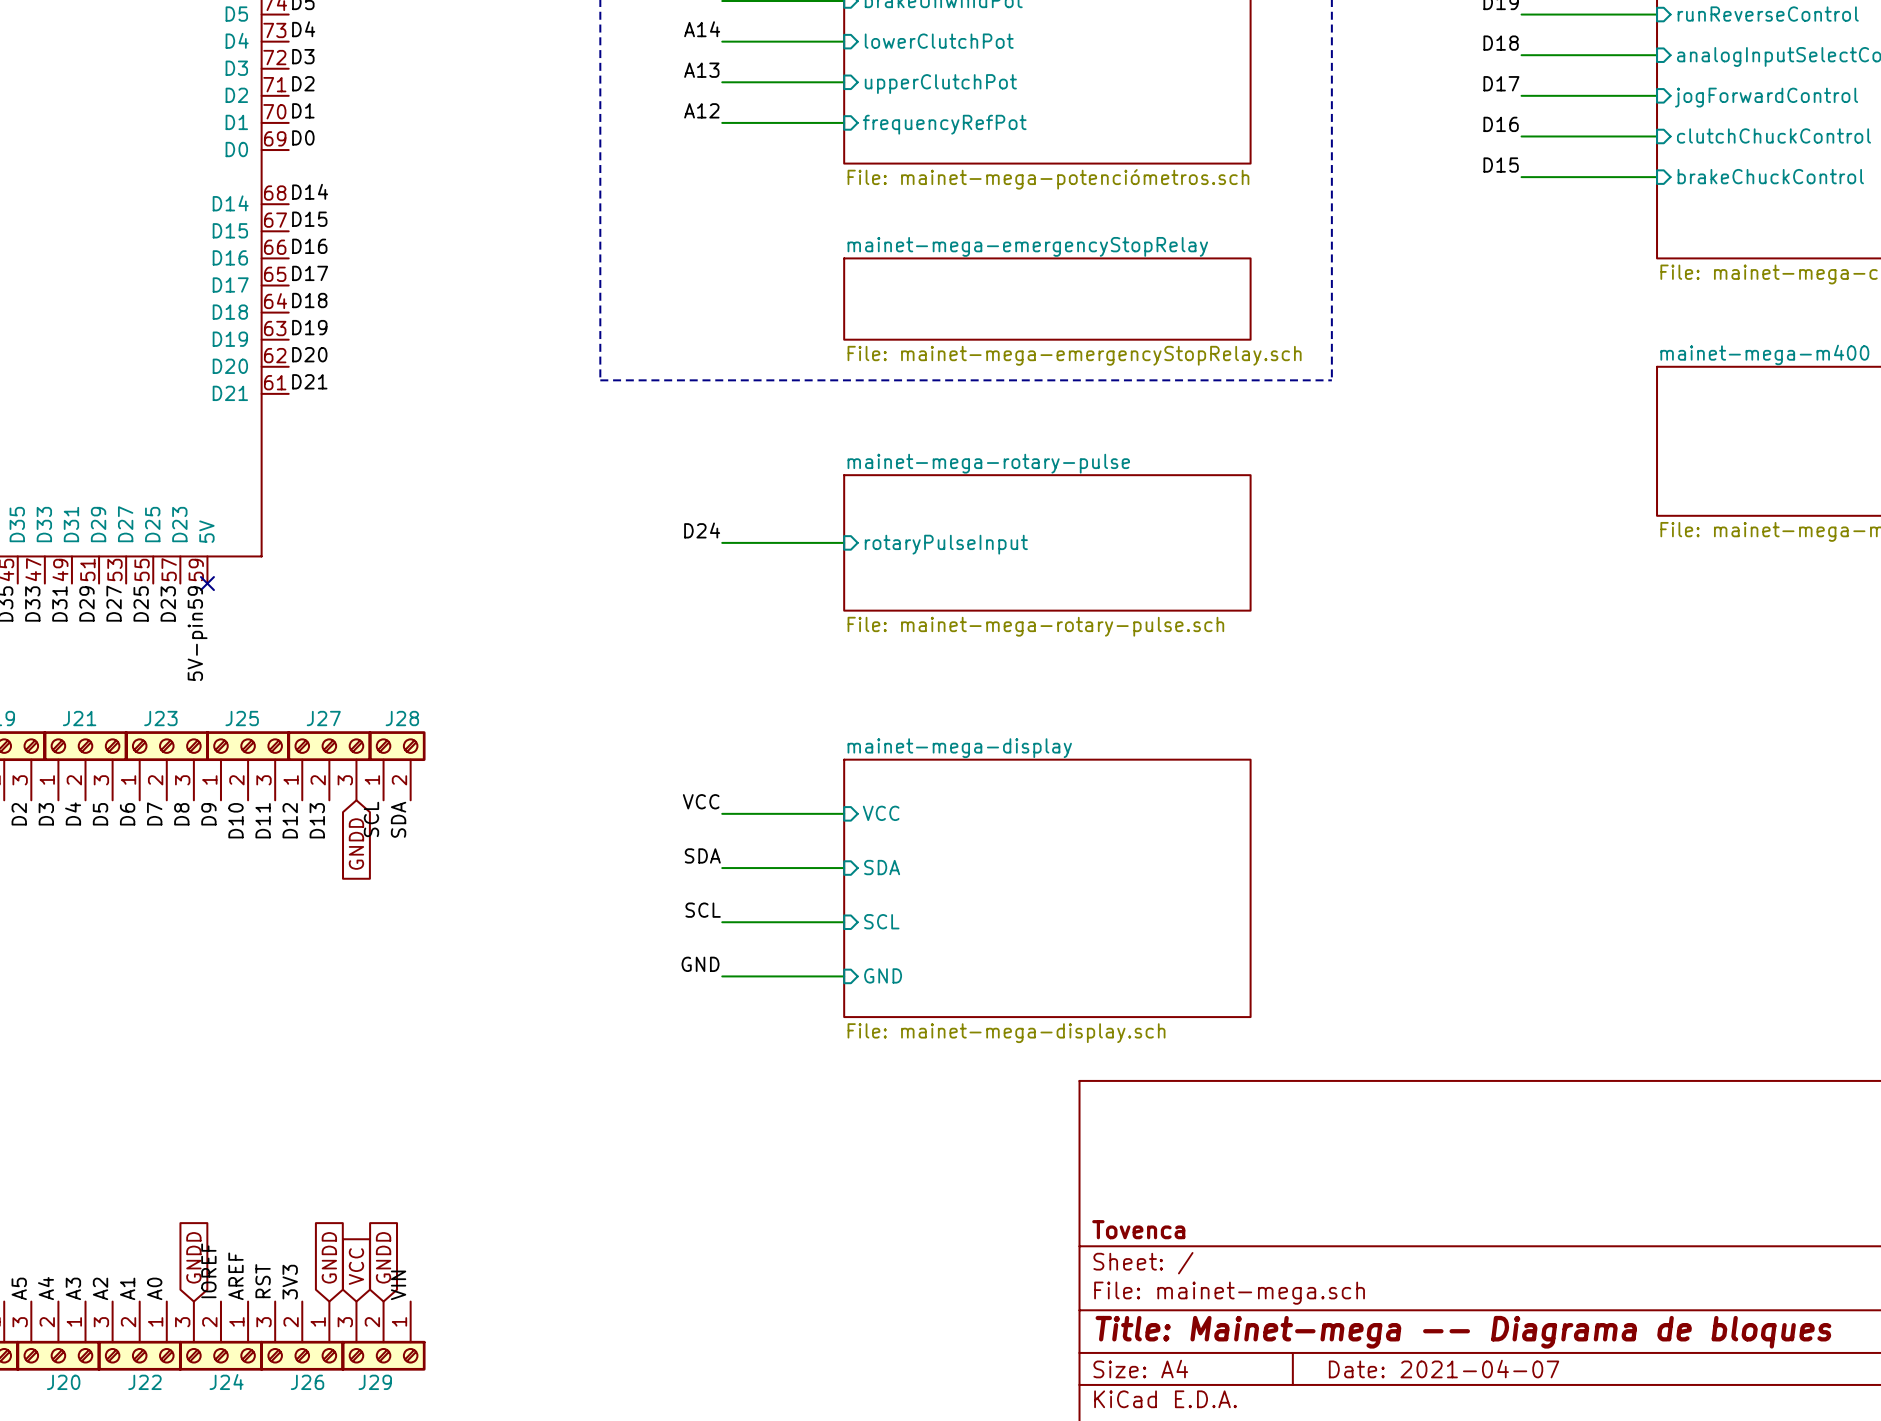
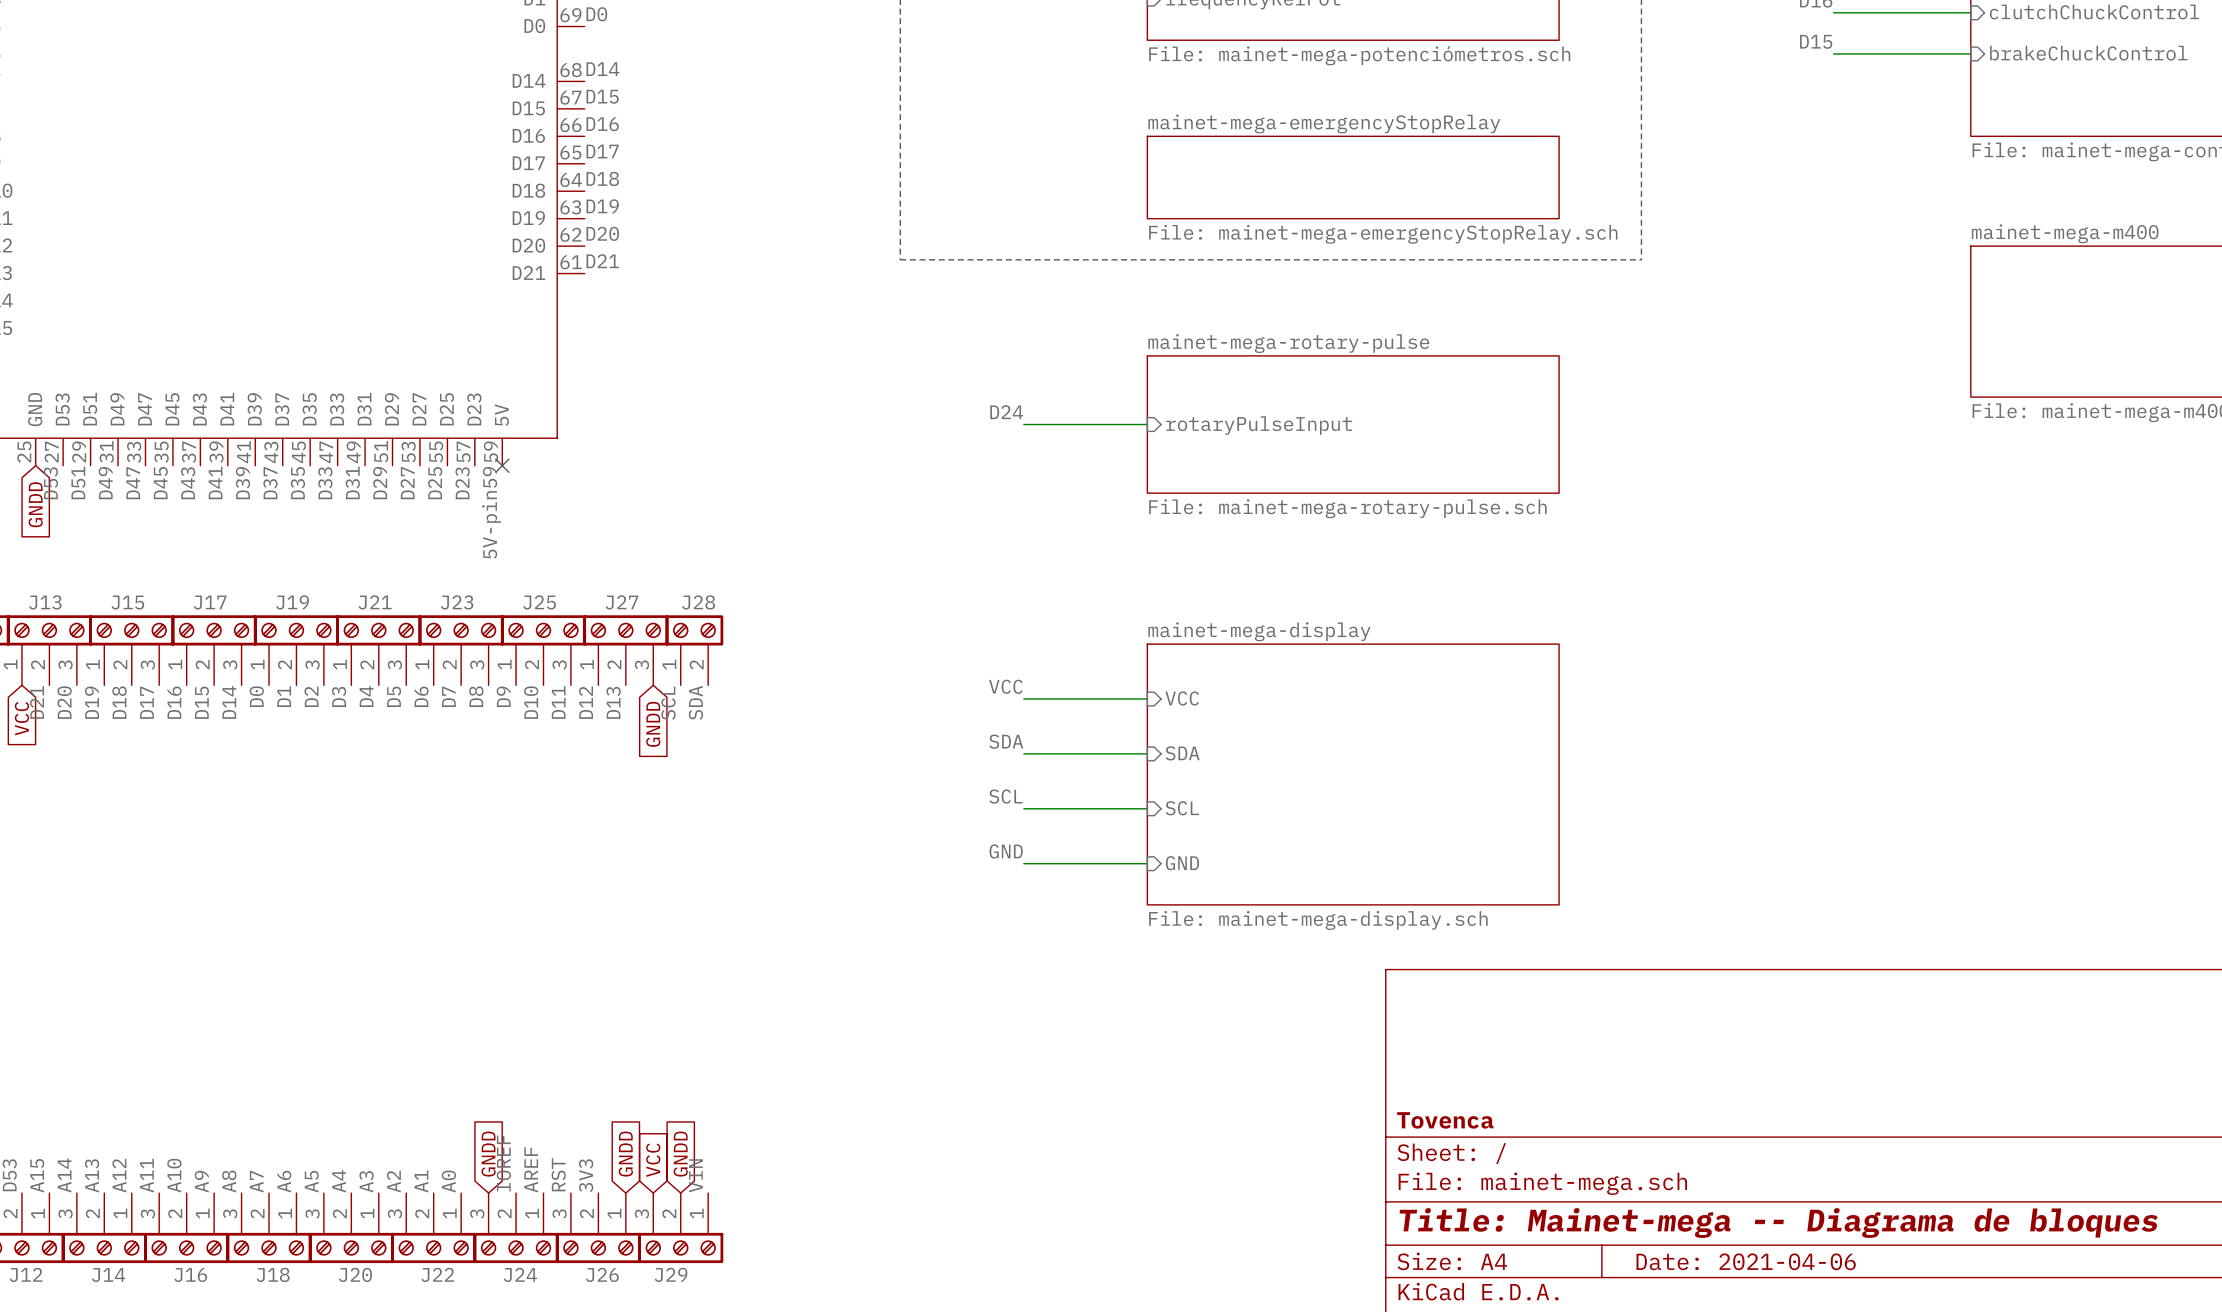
title block: Date: 2021-04-07 (1444, 1369) -> Date: 2021-04-06 (1746, 1261)

